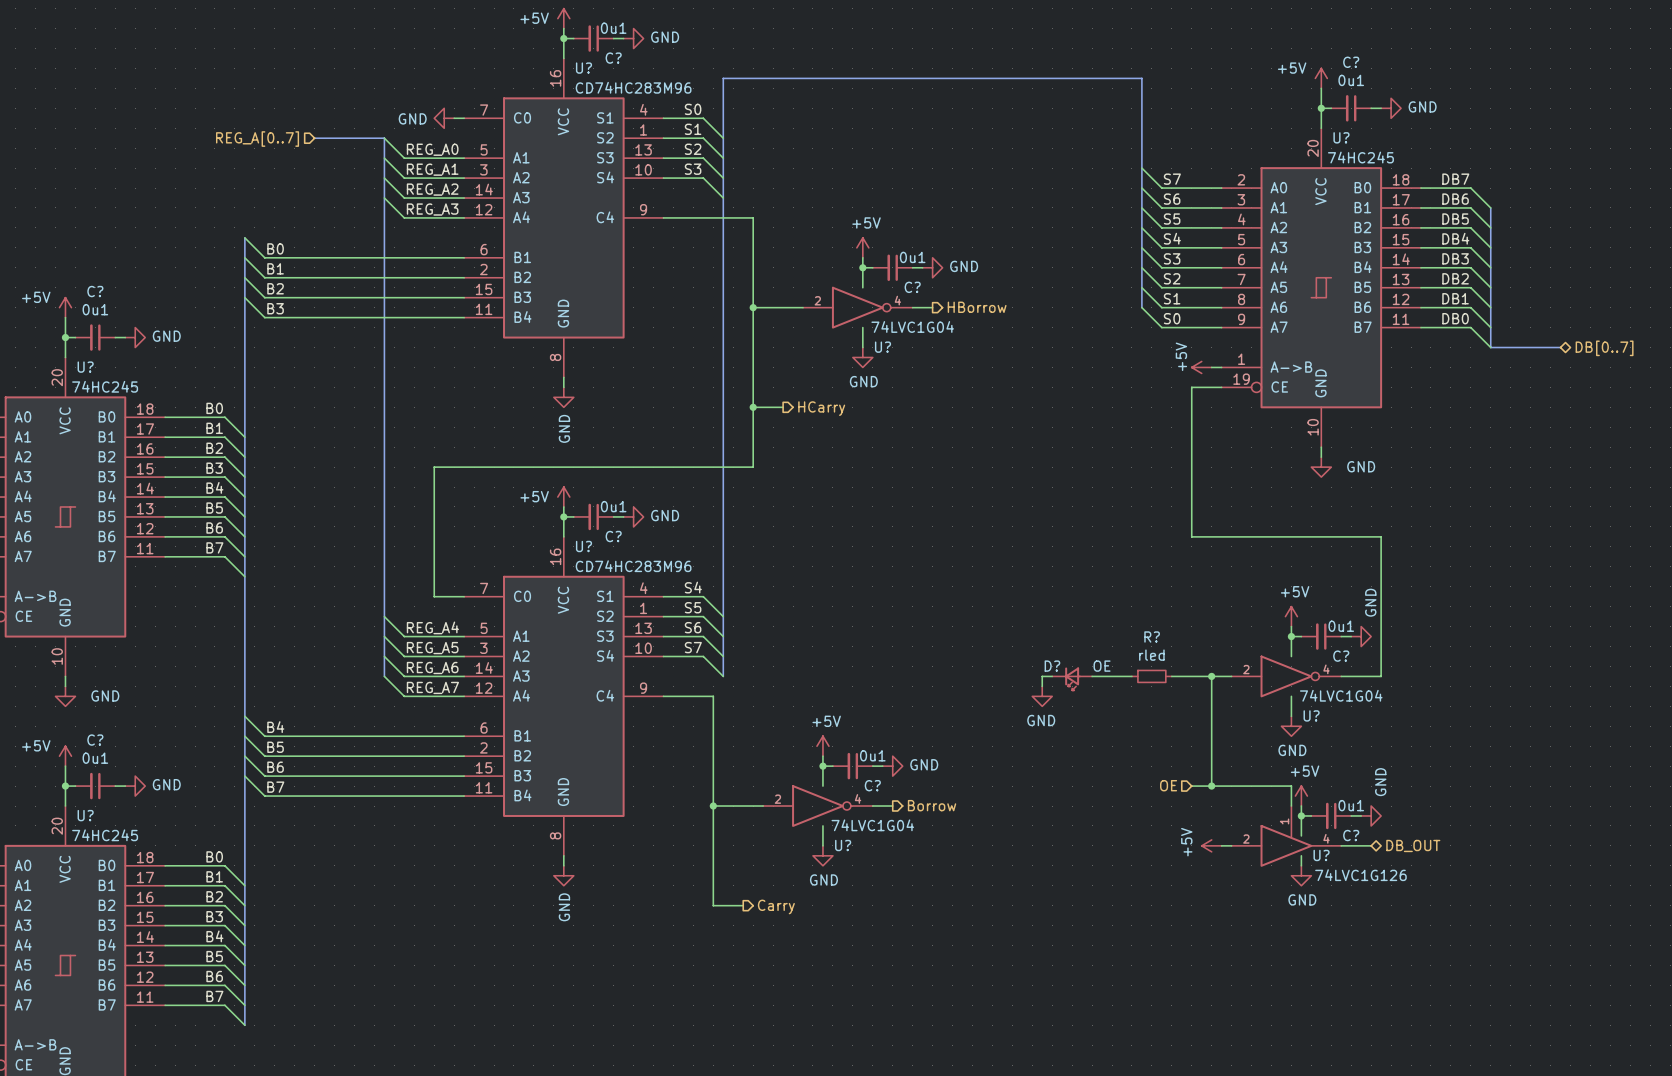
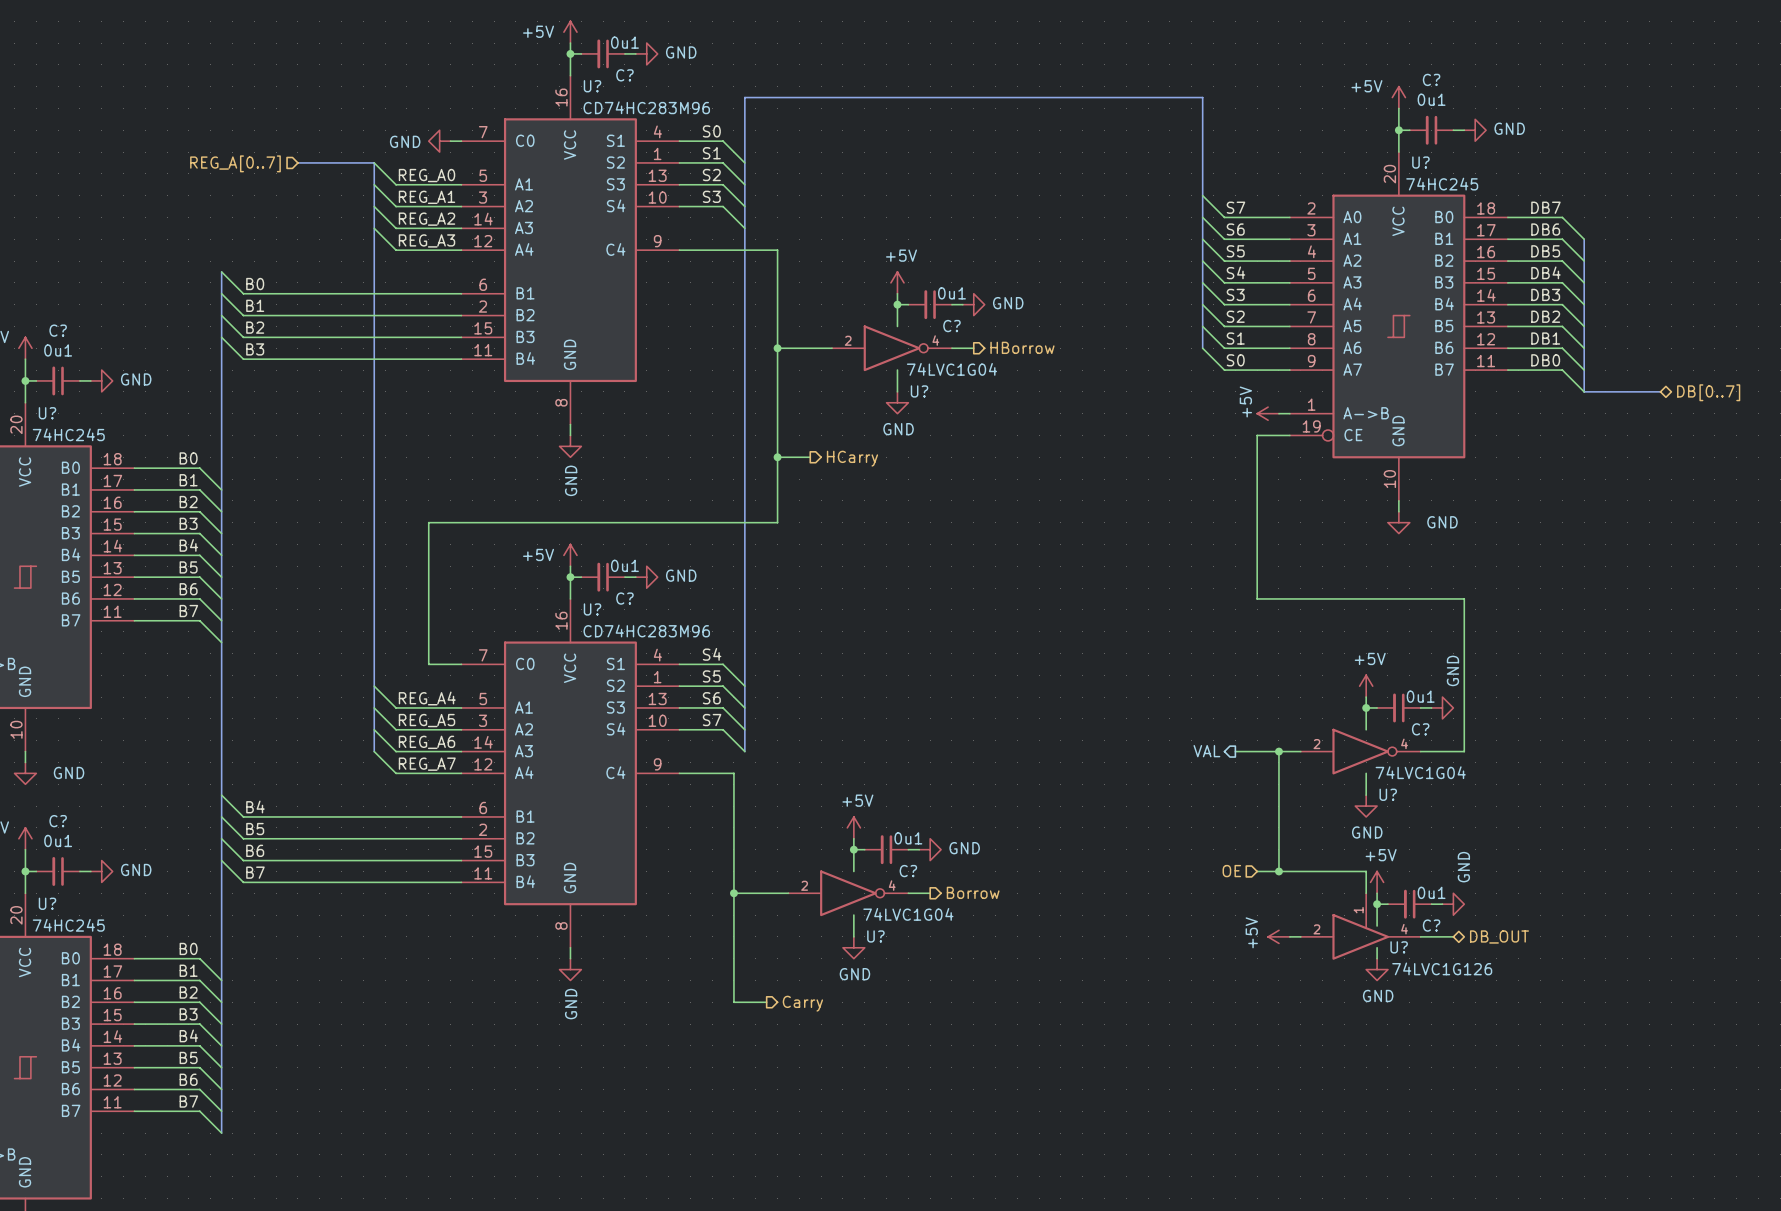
wire: (1052, 676) (1042, 676) (1042, 686) -> none
wire: (1092, 676) (1131, 676) -> none
sheet pin: none -> VAL (1206, 751)
R?: rled (1151, 676) -> none
D?: OE (1072, 678) -> none
power symbol: GND (1042, 696) -> none

